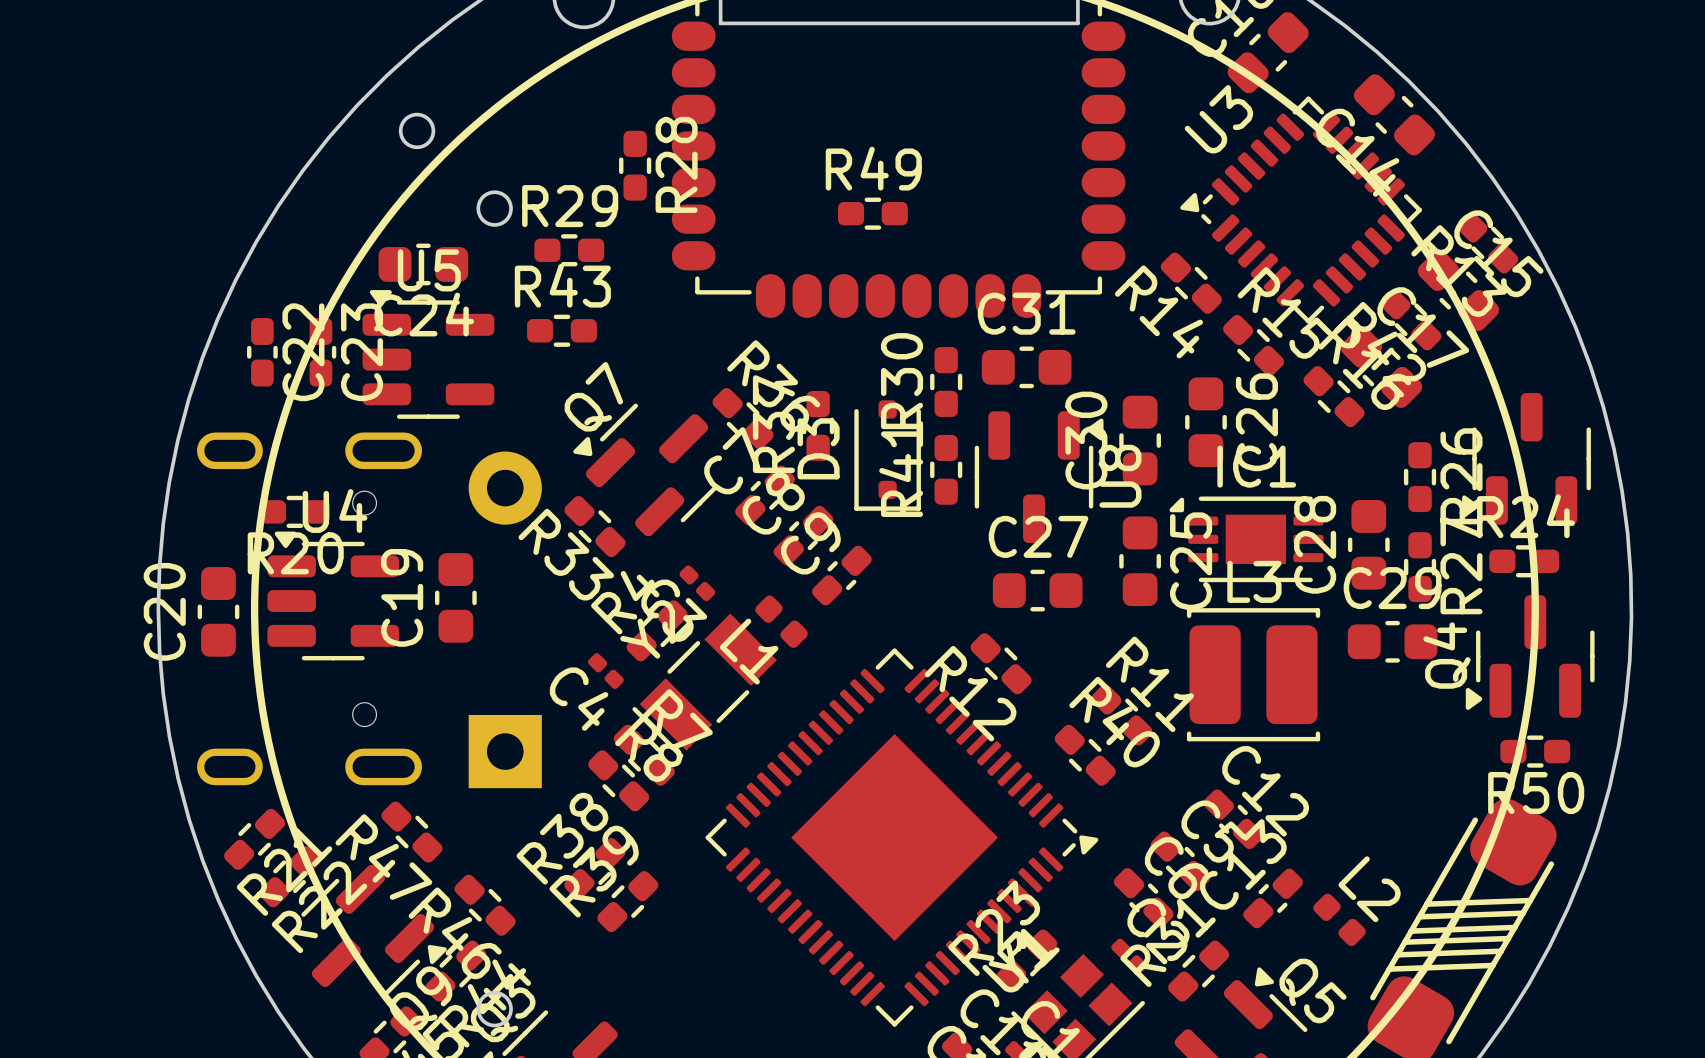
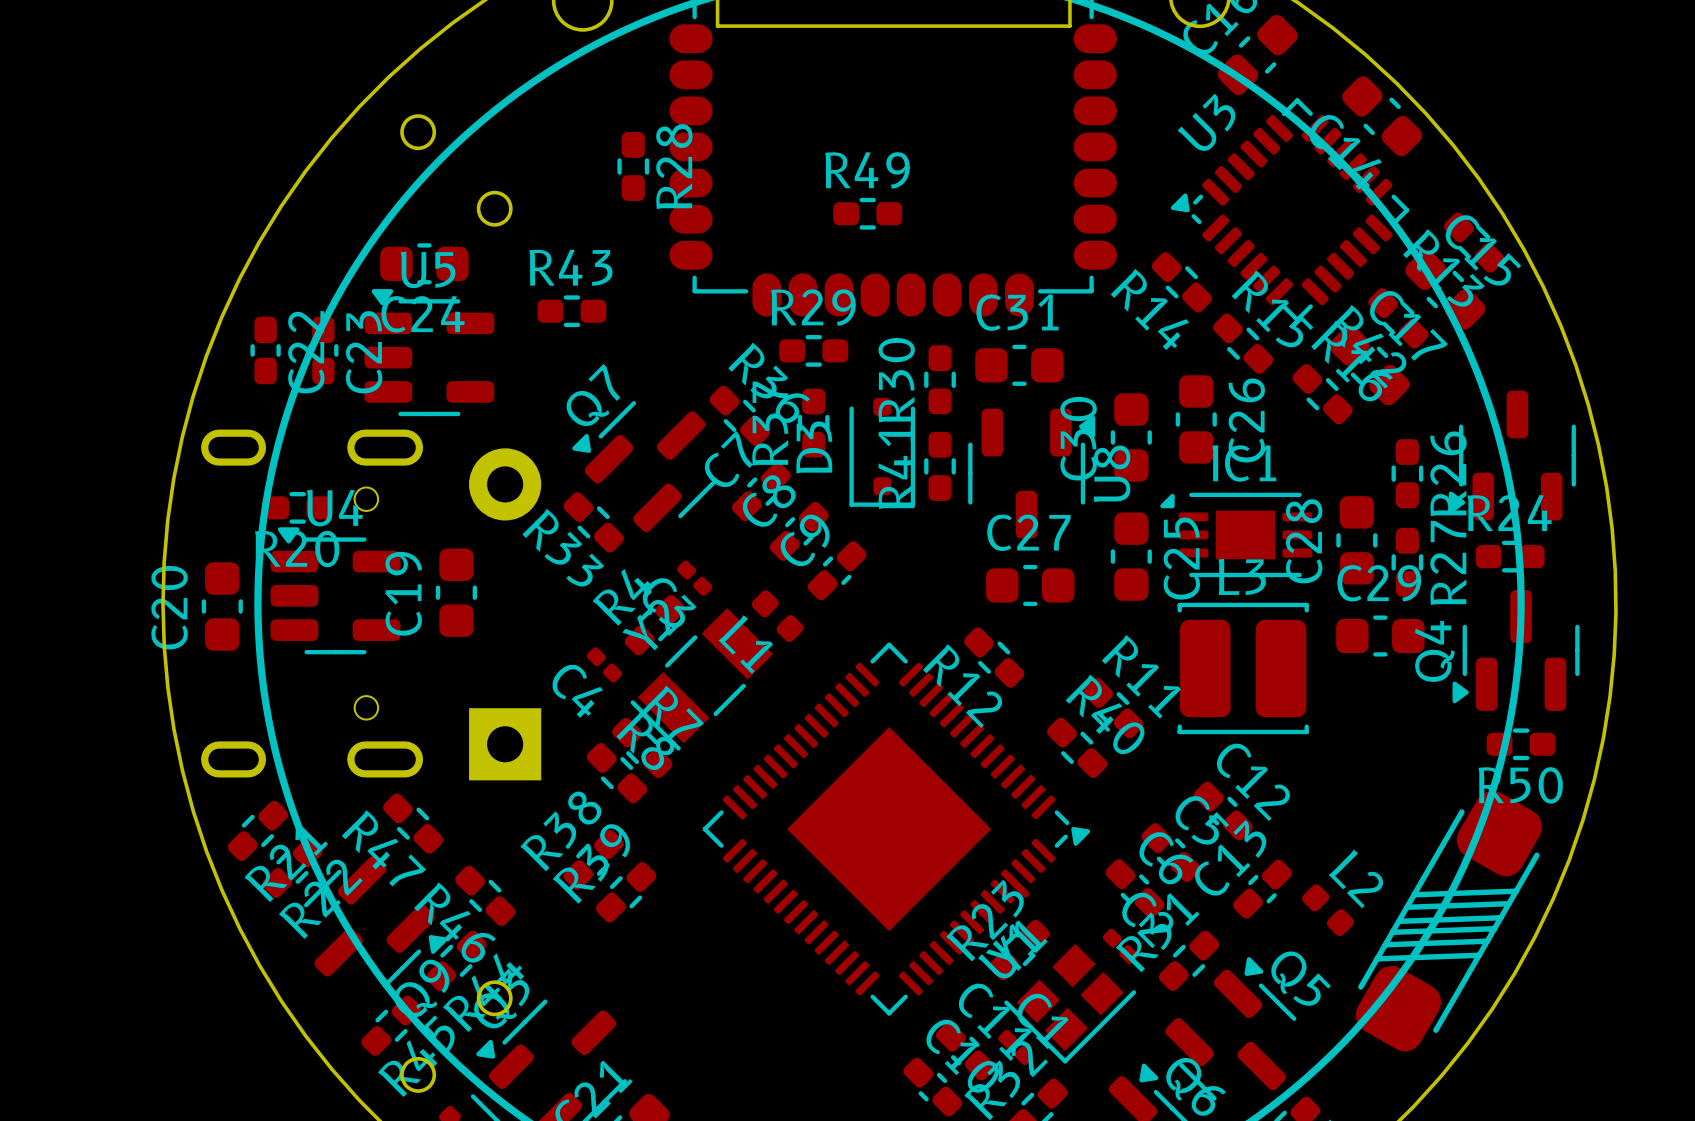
R29 position: (569, 250) -> (813, 350)
R43 position: (561, 330) -> (571, 311)

